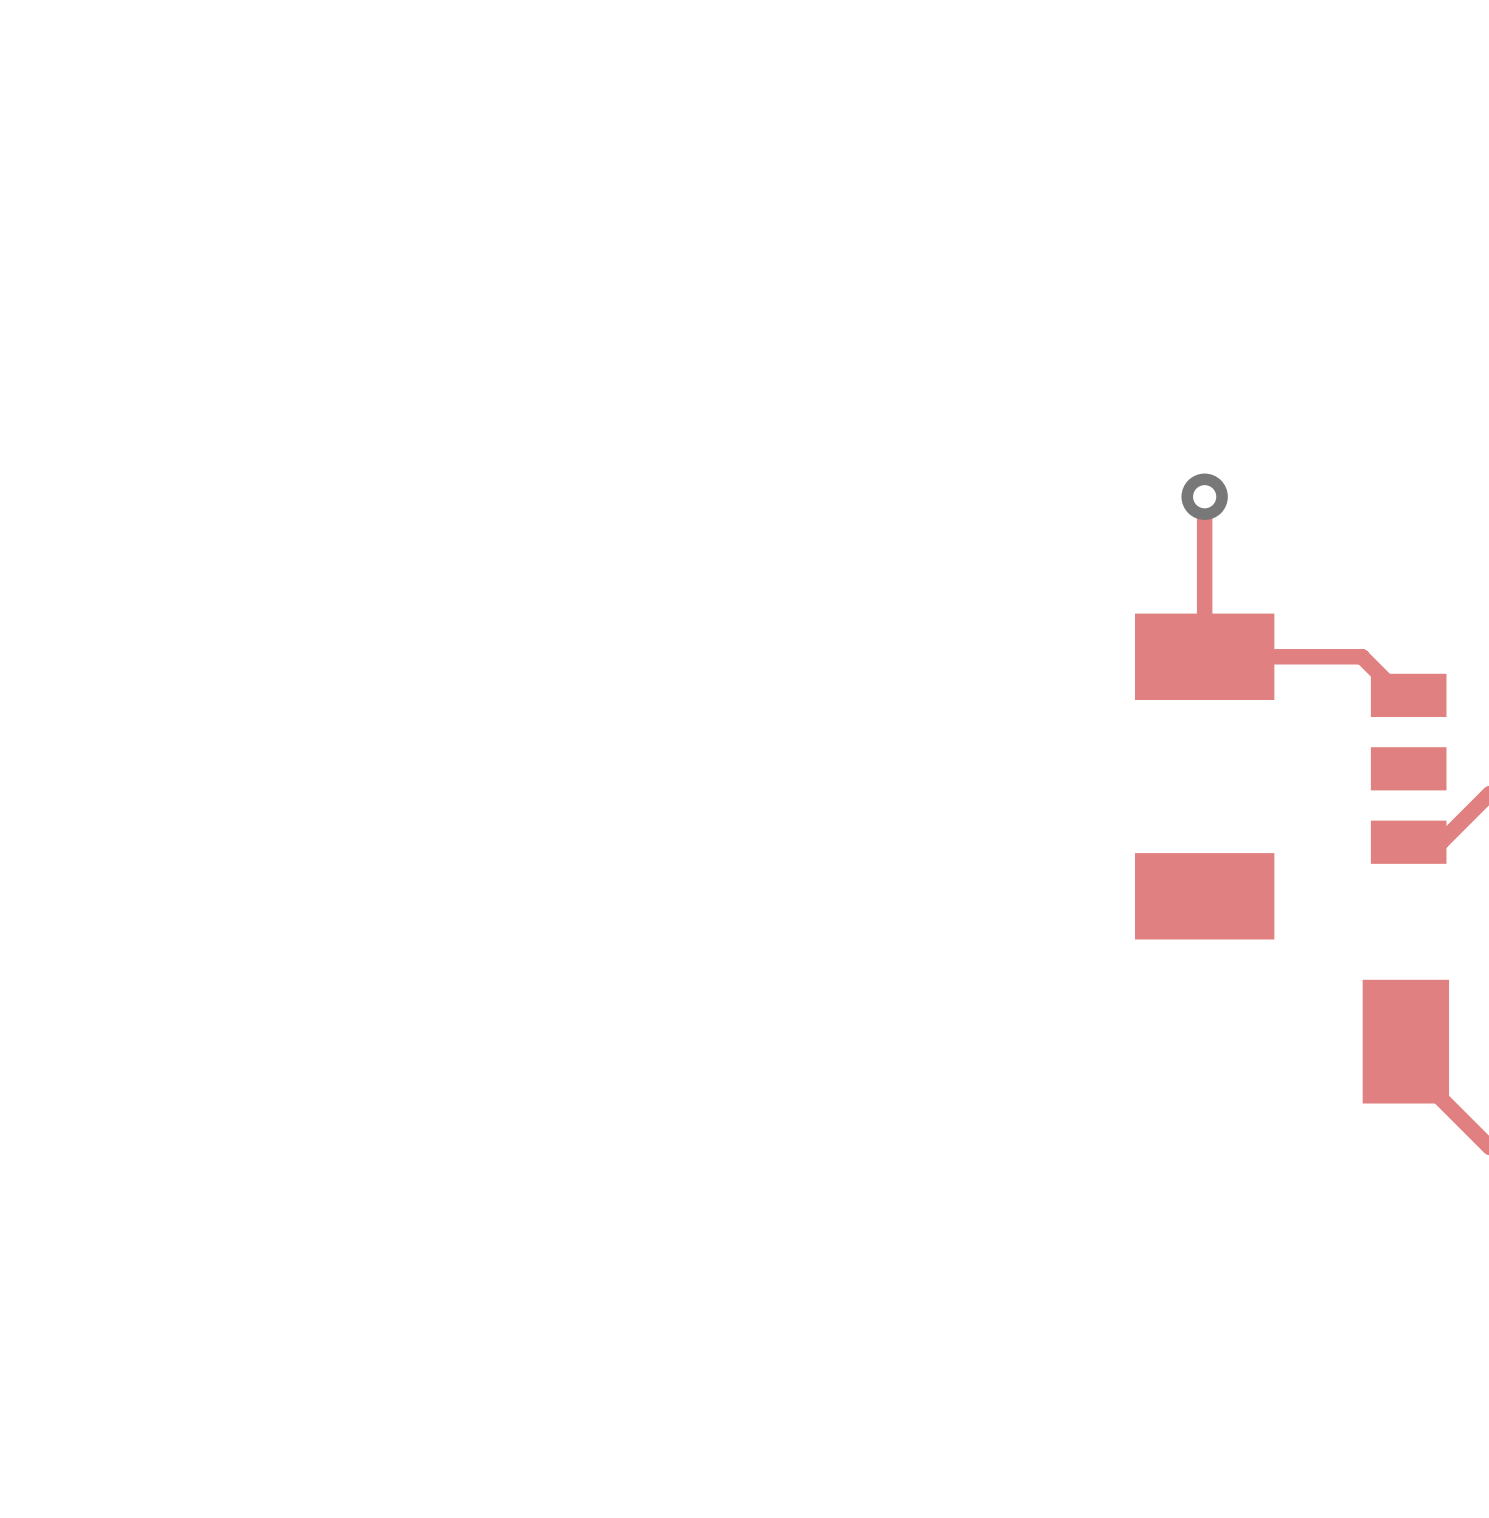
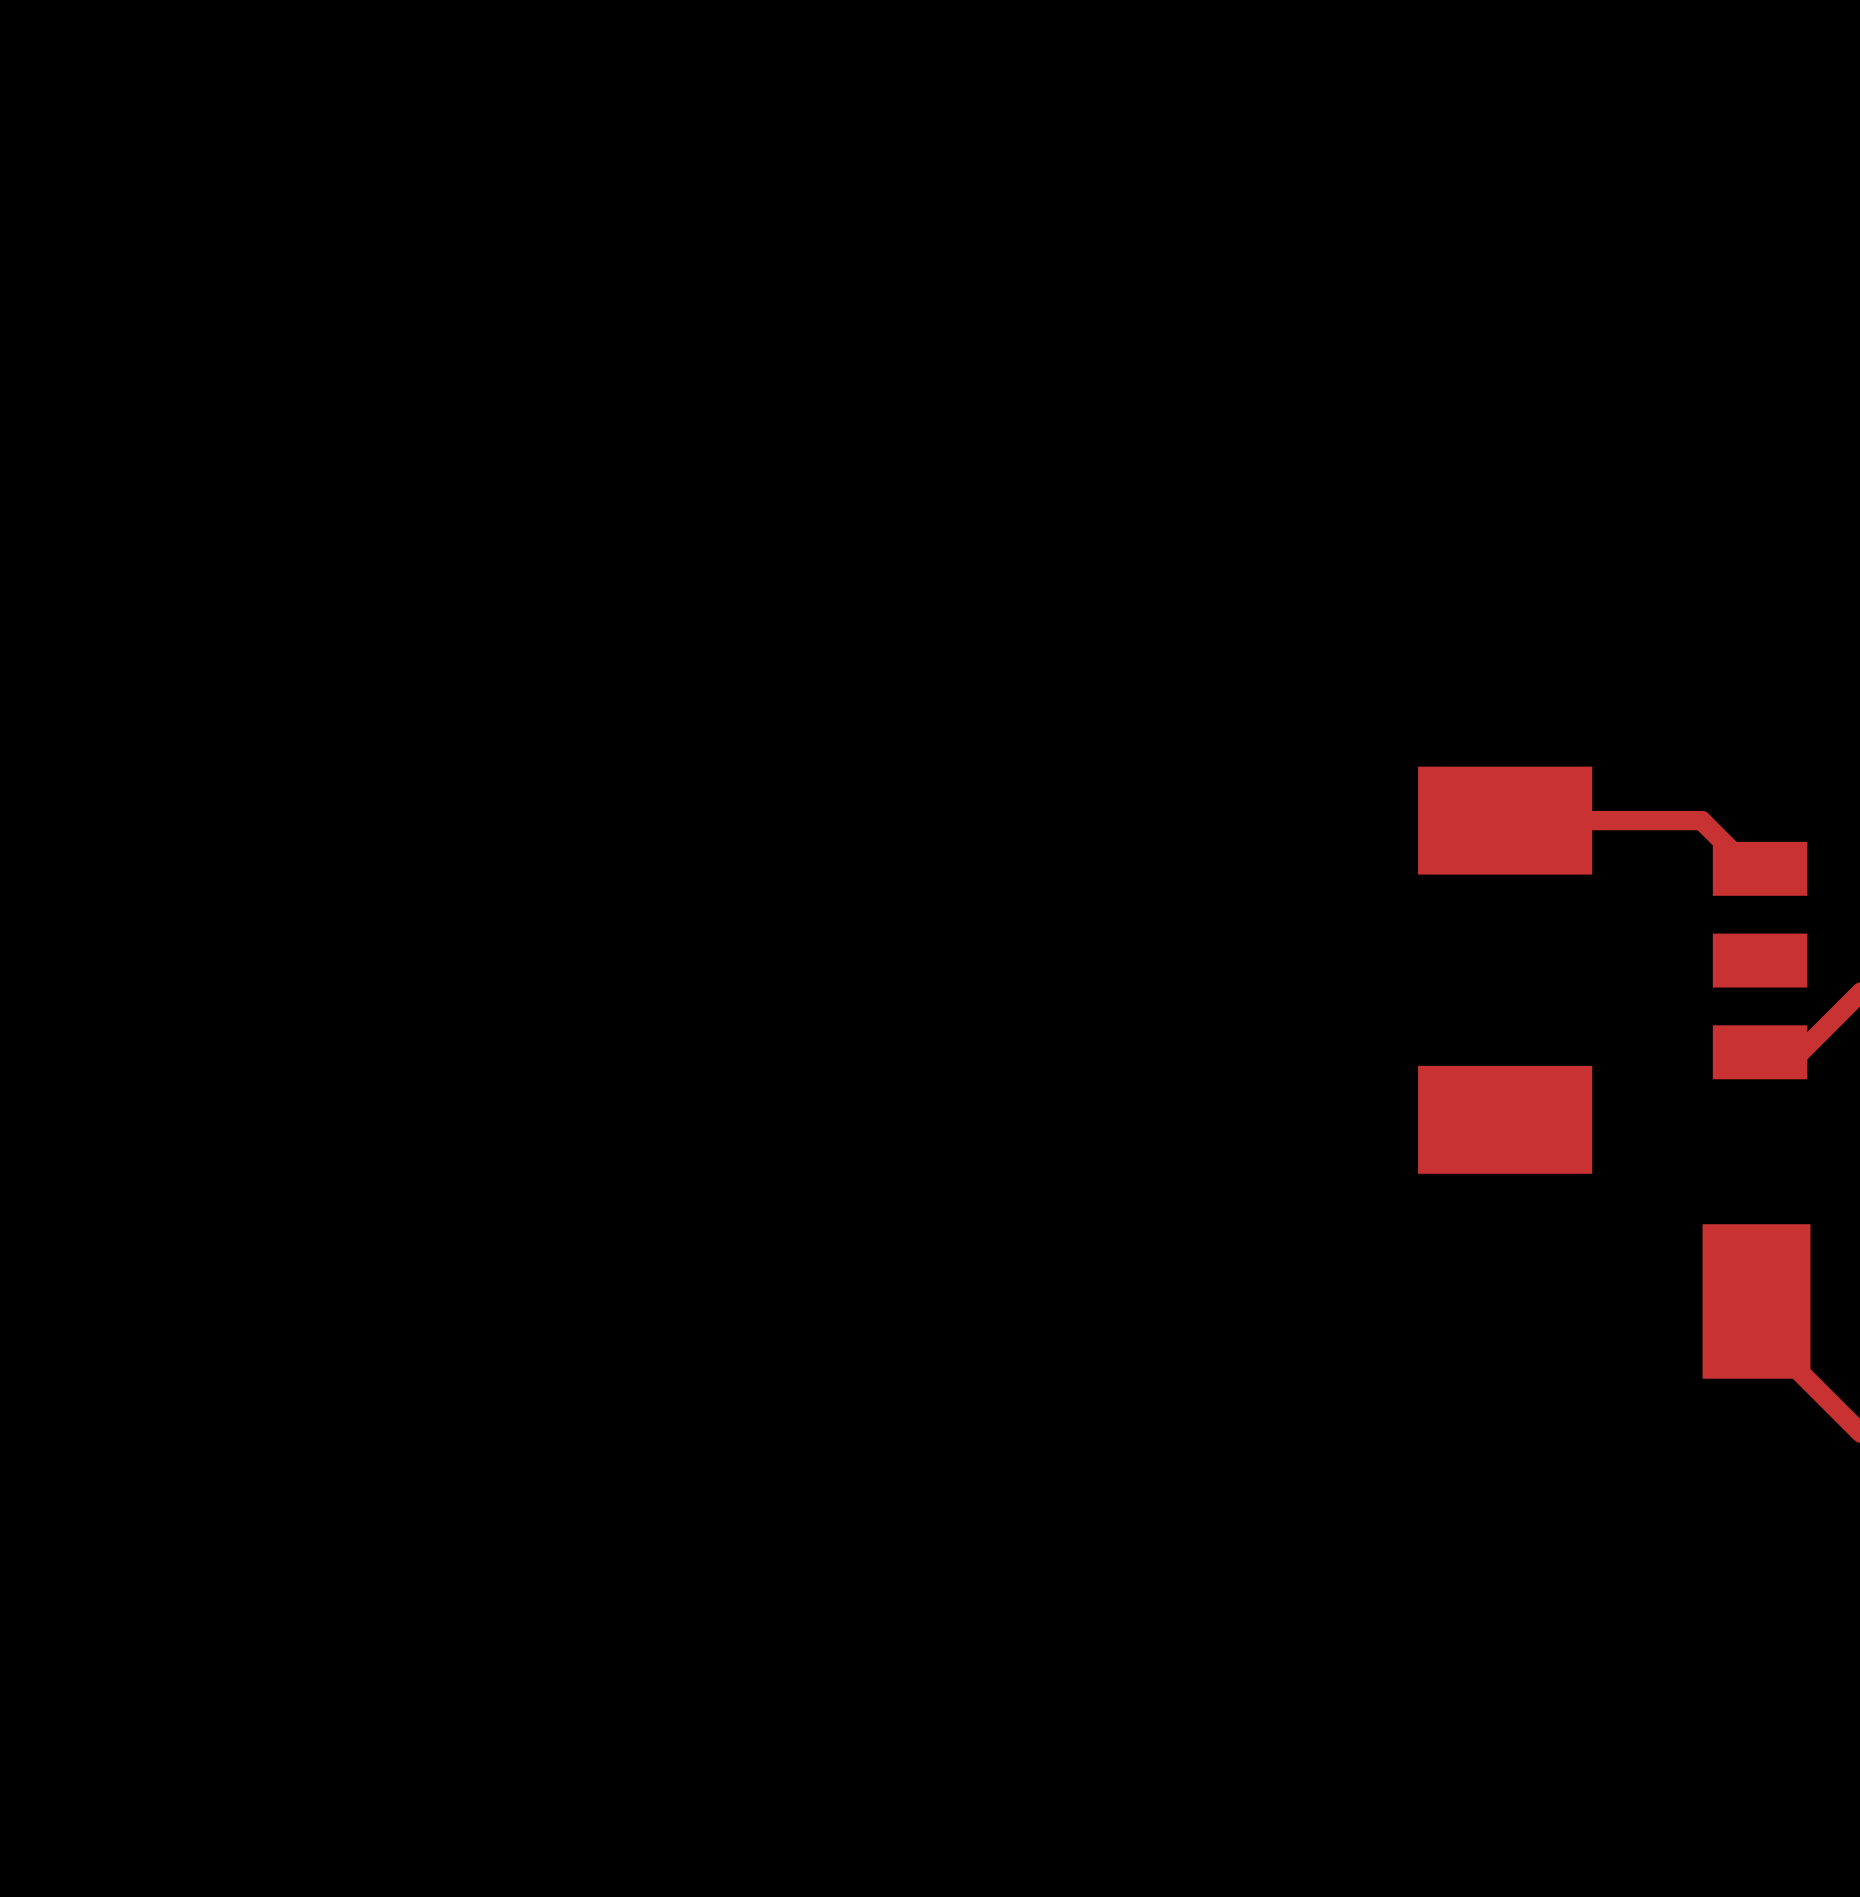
top track: (1204, 496) (1204, 656) -> none
via: (1204, 496) -> none

